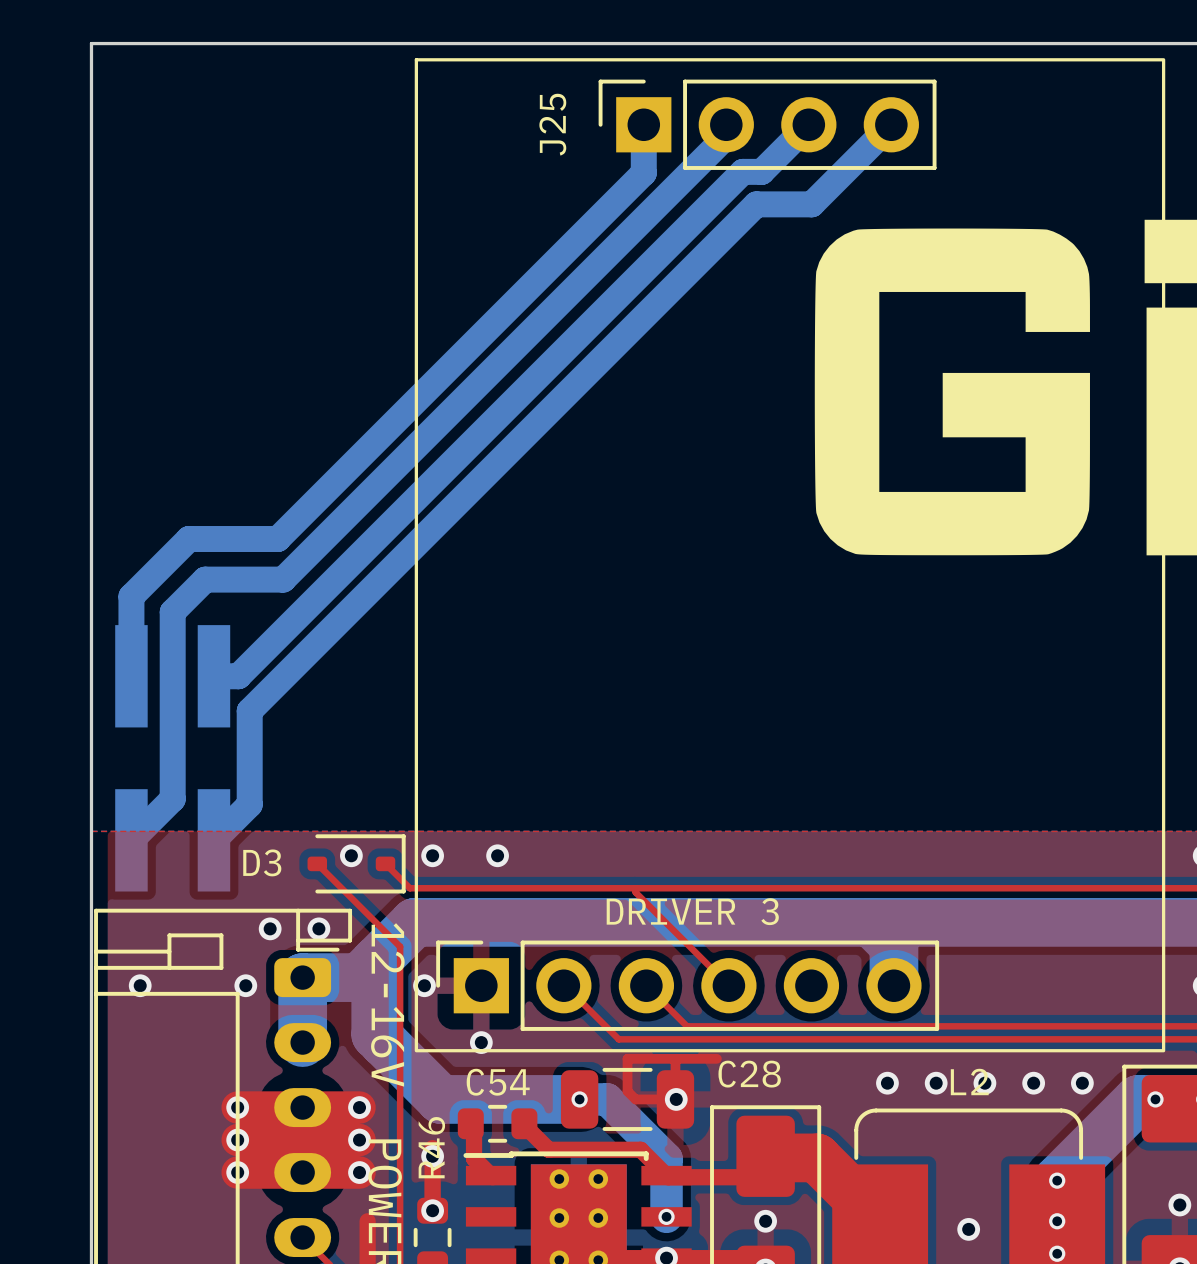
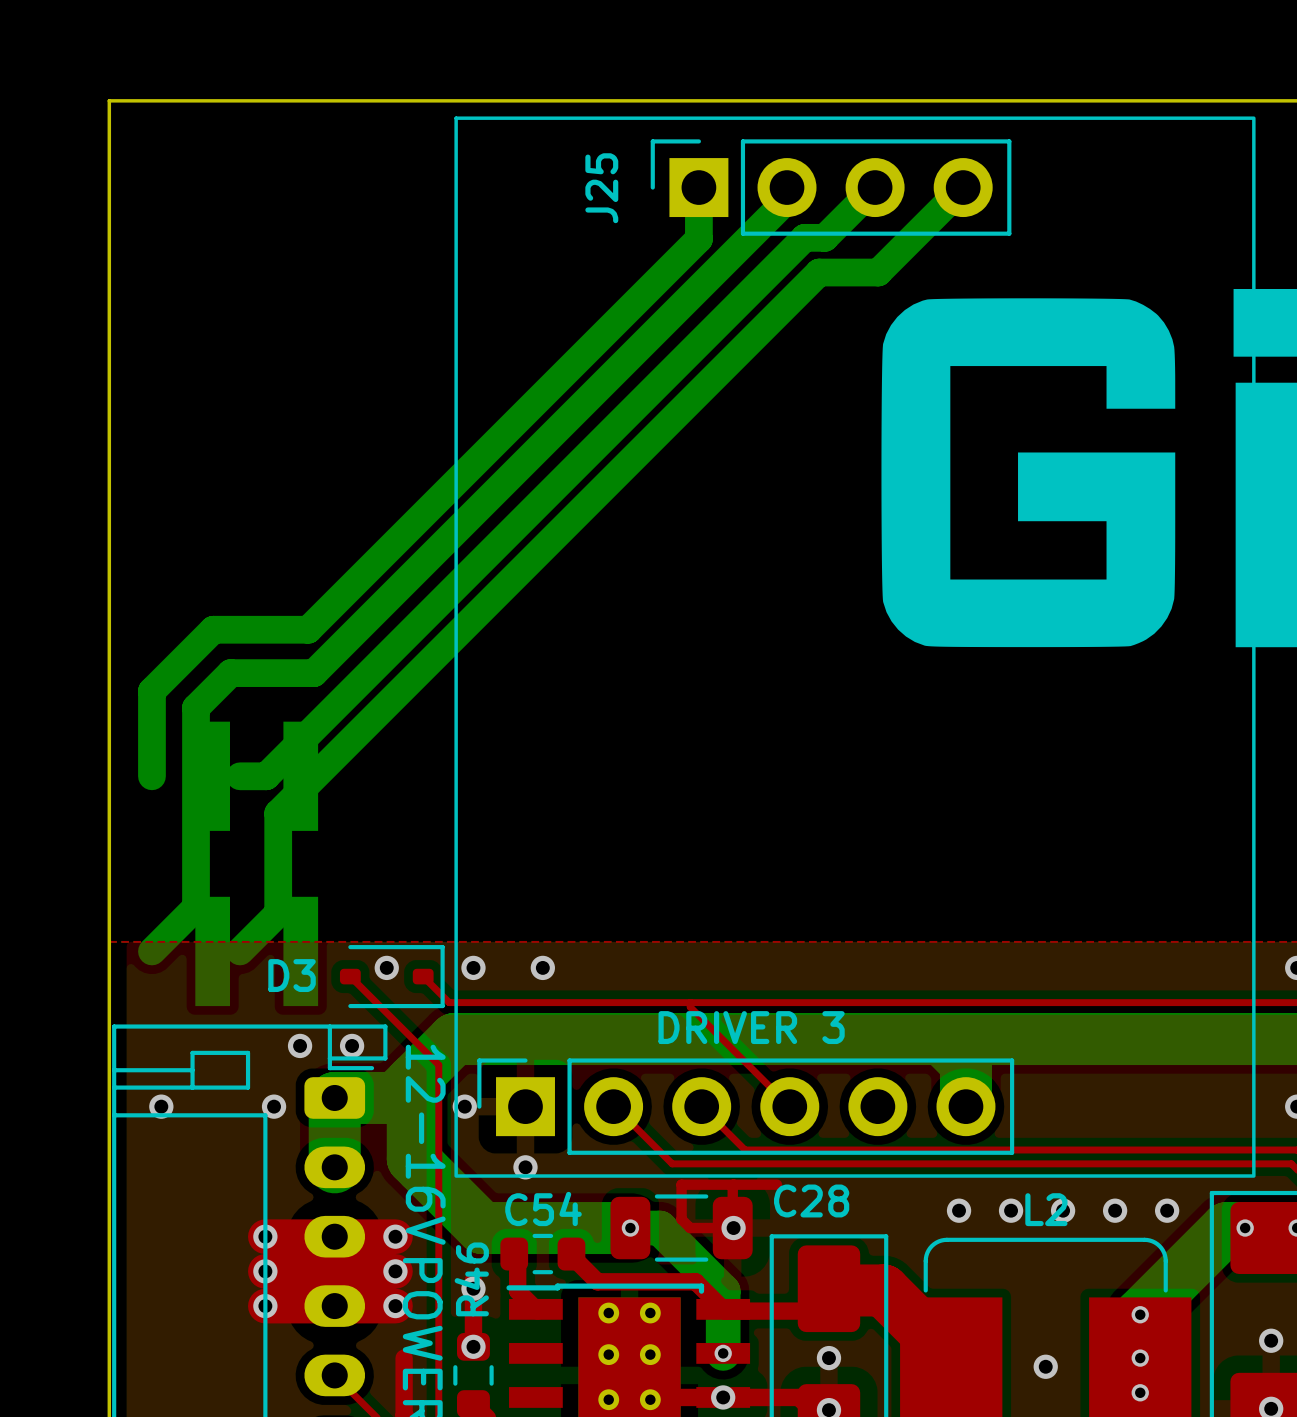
part position: (172, 758) -> (256, 863)

